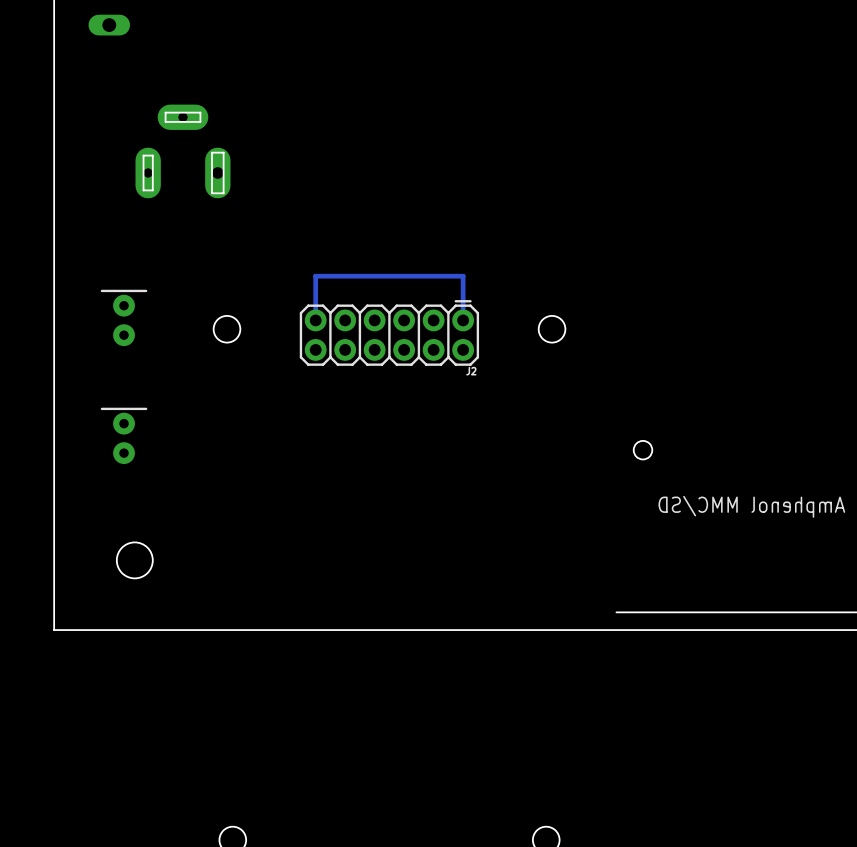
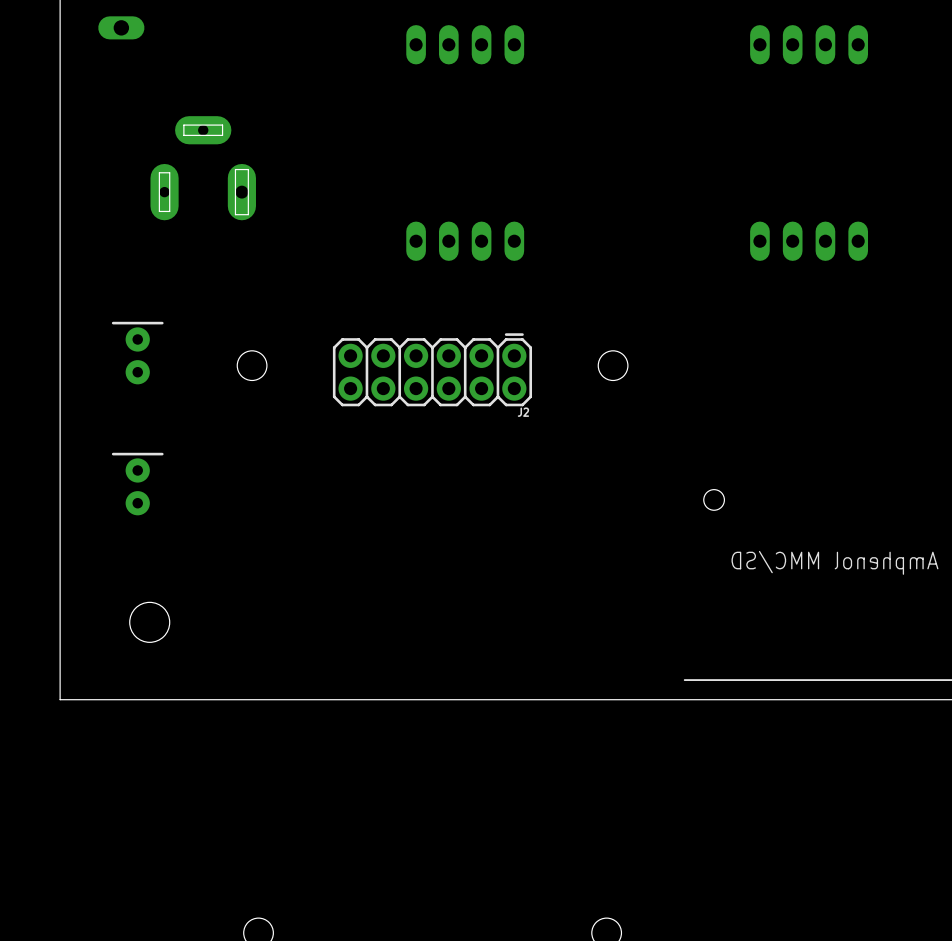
part: none -> (465, 44)
part: none -> (809, 44)
part: none -> (465, 241)
part: none -> (809, 241)
track: (463, 320) (463, 276) (315, 276) (315, 320) -> none

